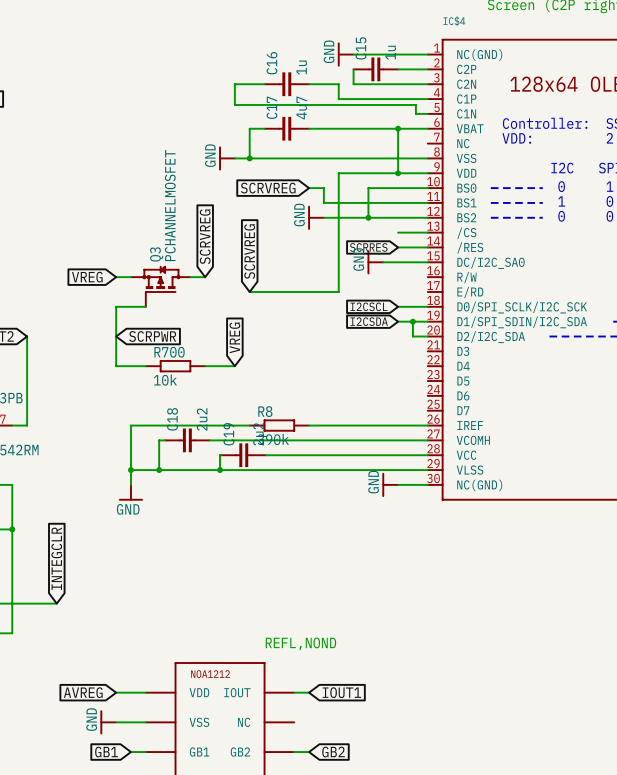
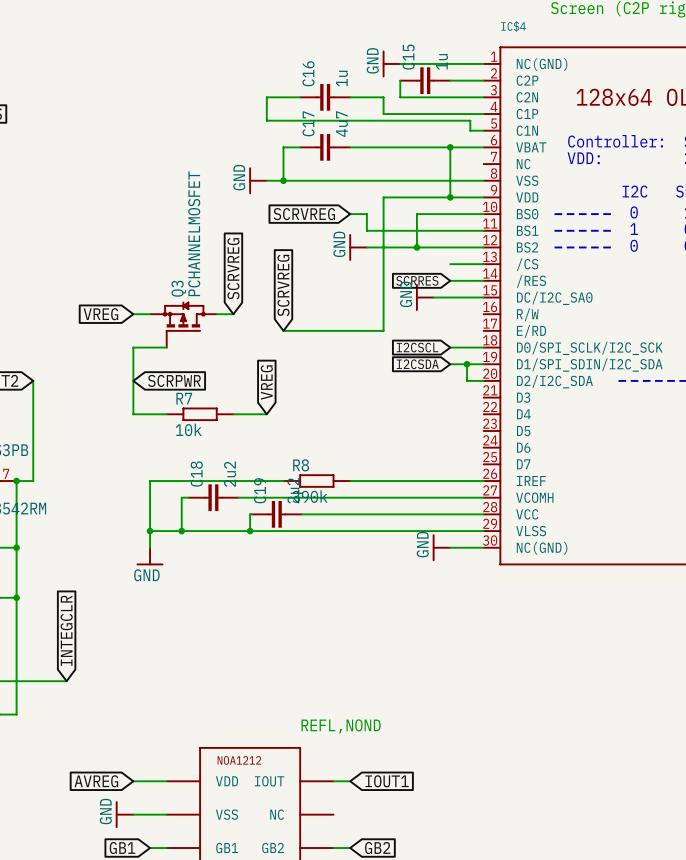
R700 name: R700 (169, 352) -> R7 (184, 398)
wire: none -> (16, 481) (16, 547)
junction: none -> (16, 481)
junction: none -> (16, 547)

